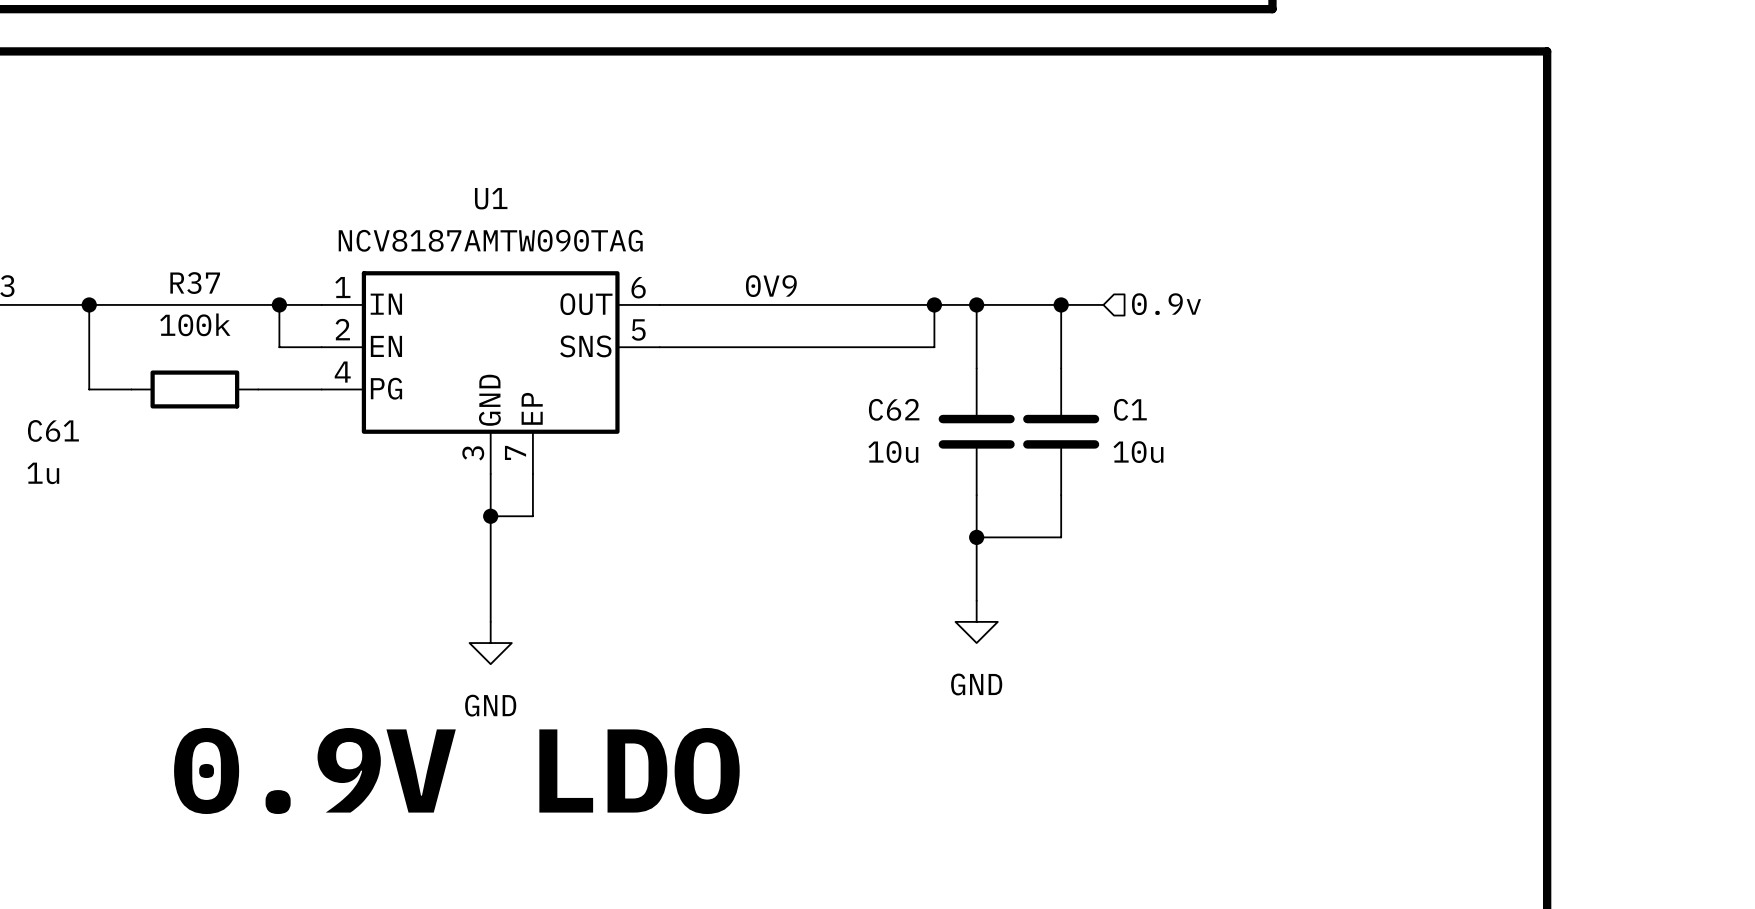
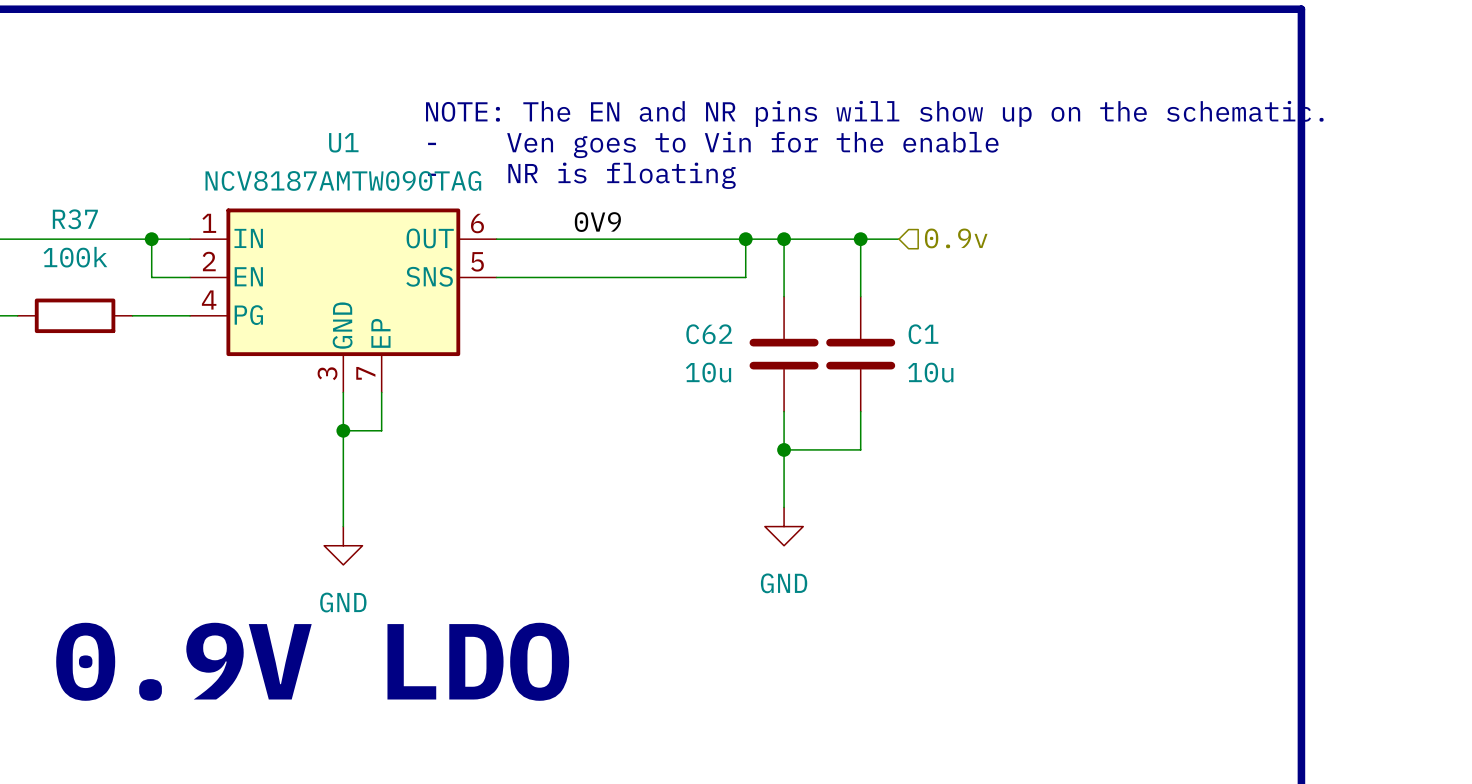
text: none -> NOTE: The EN and NR pins will show up on the schematic. (874, 113)
text: none -> - Ven goes to Vin for the enable (713, 144)
text: none -> - NR is floating (581, 175)

